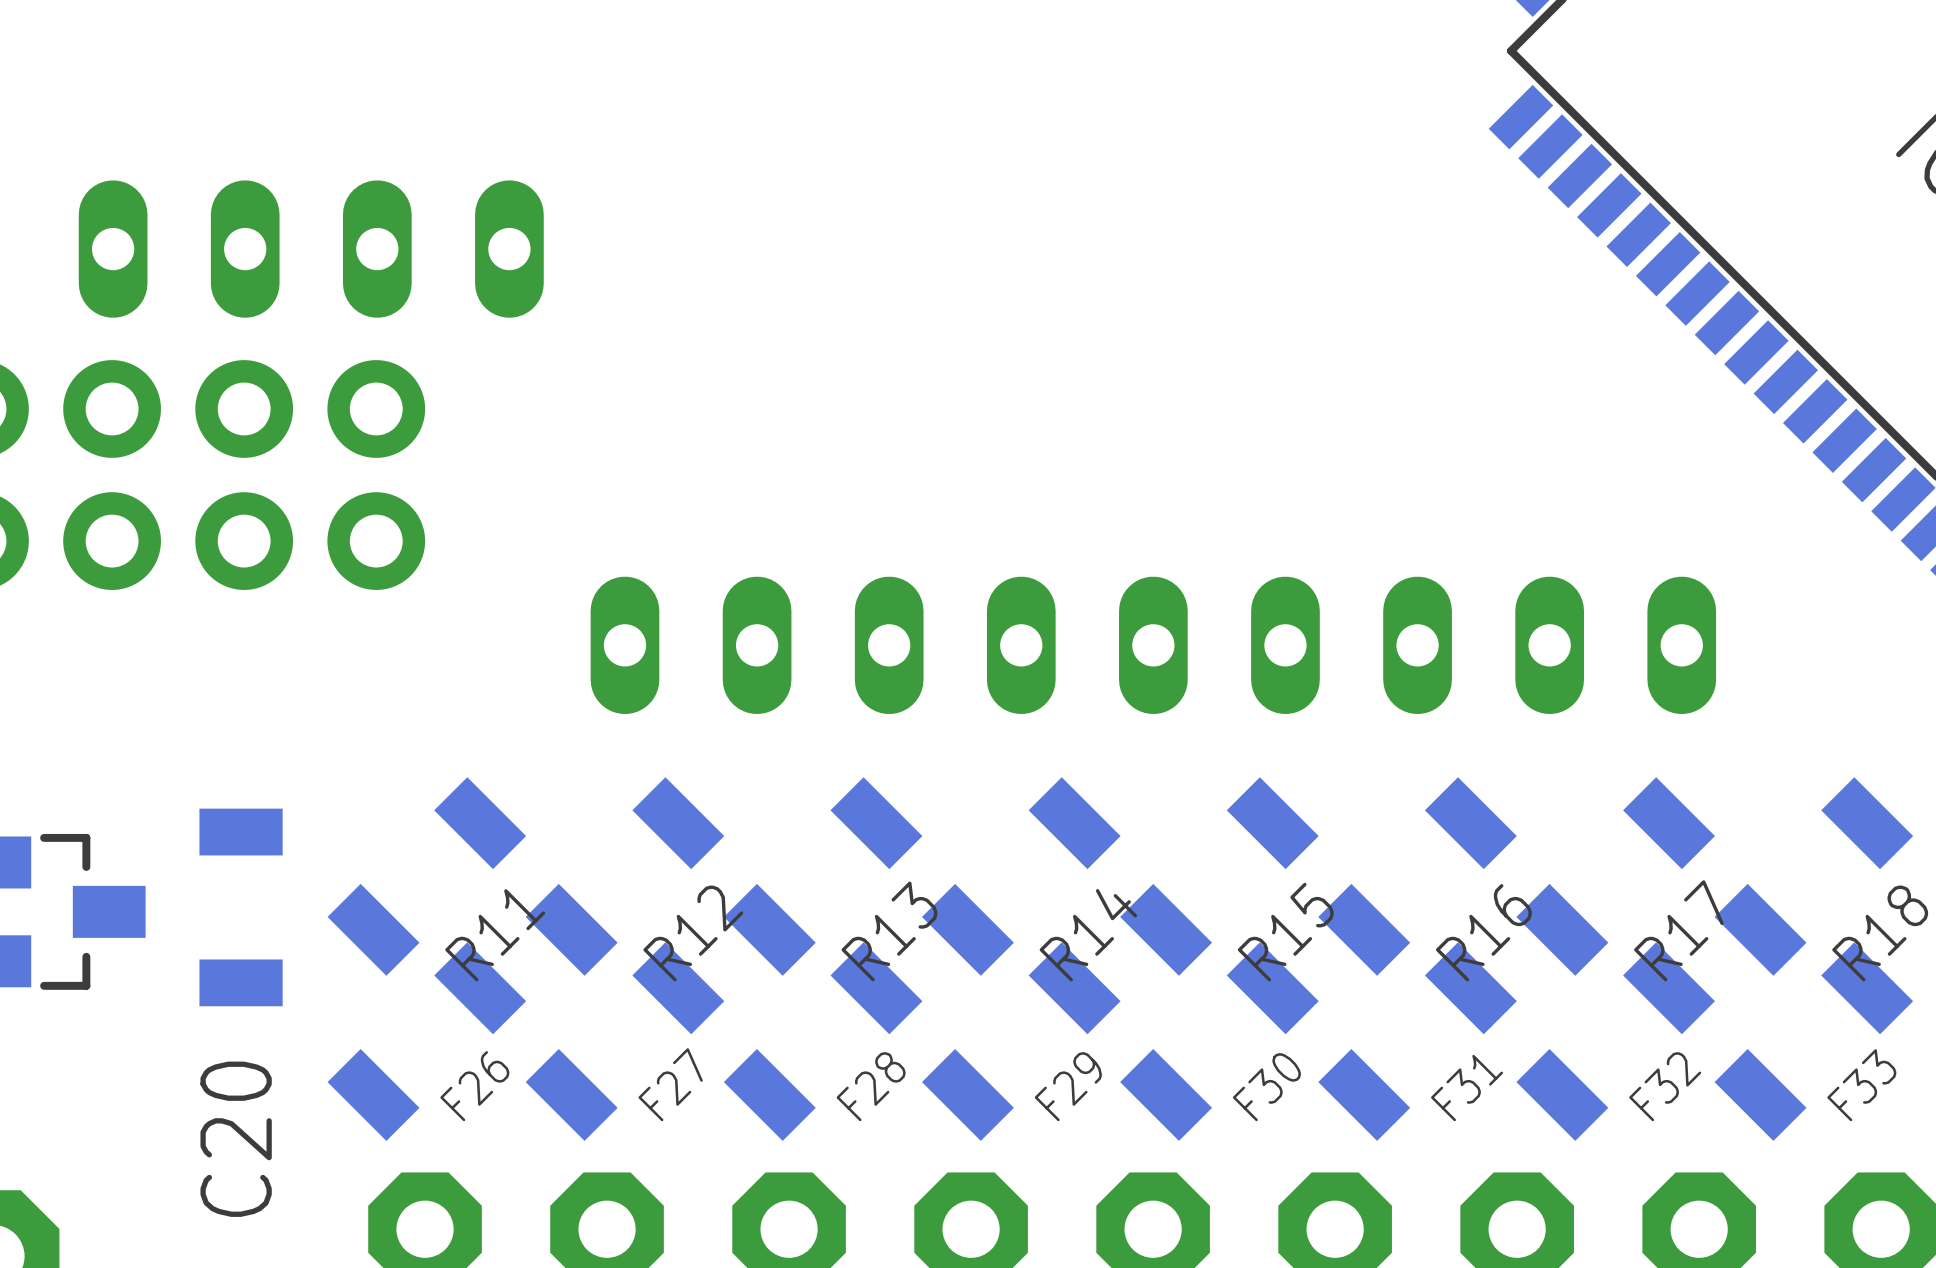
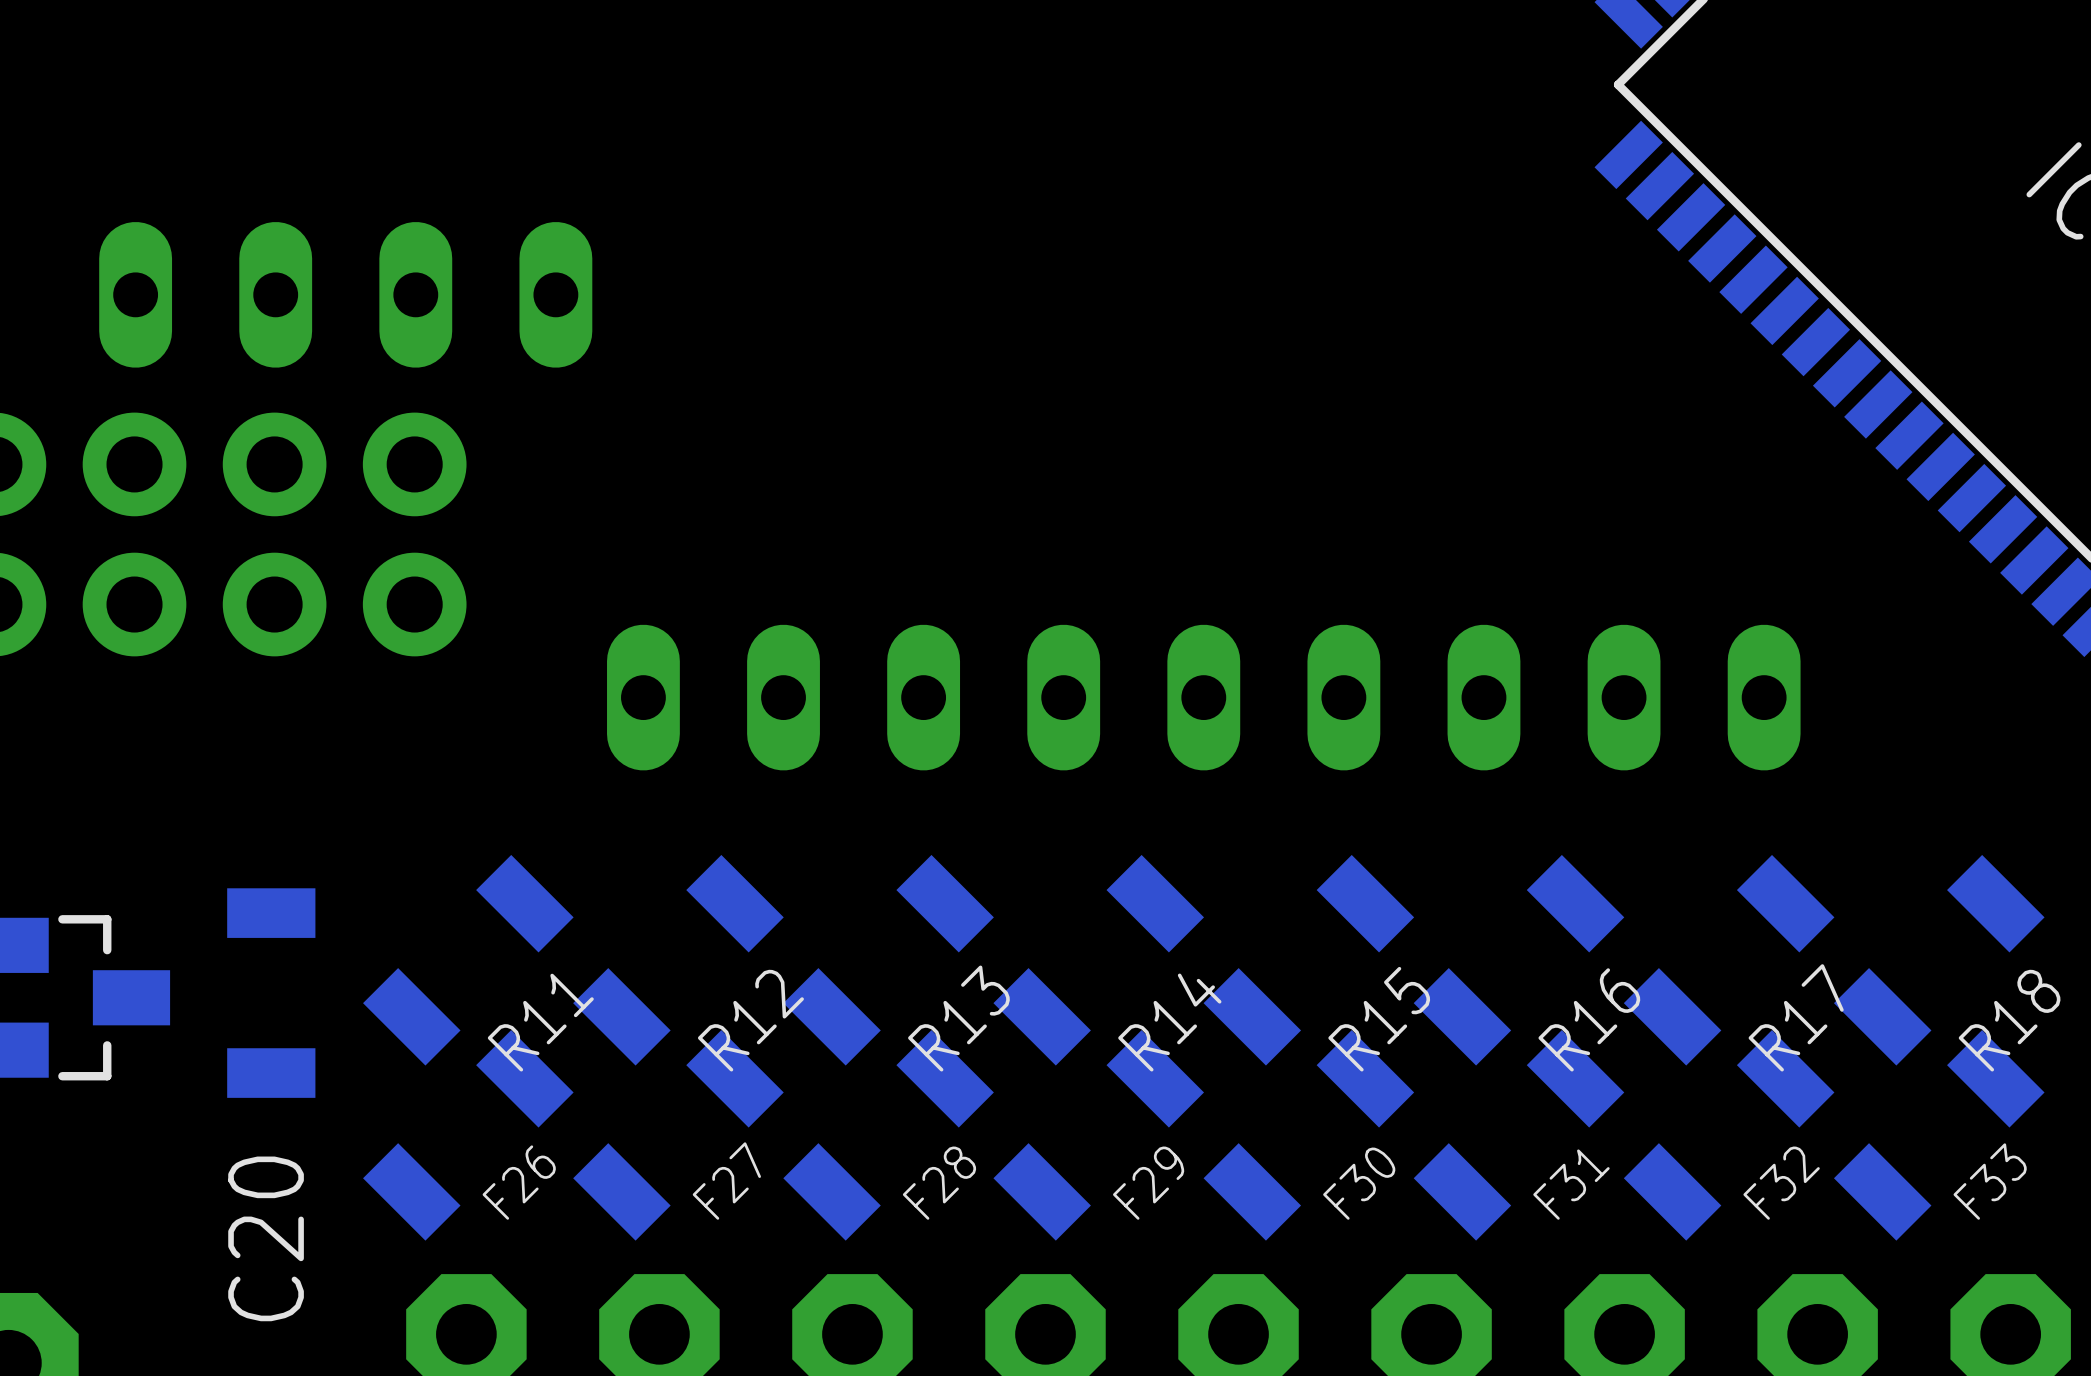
part position: (1153, 645) -> (1203, 697)

